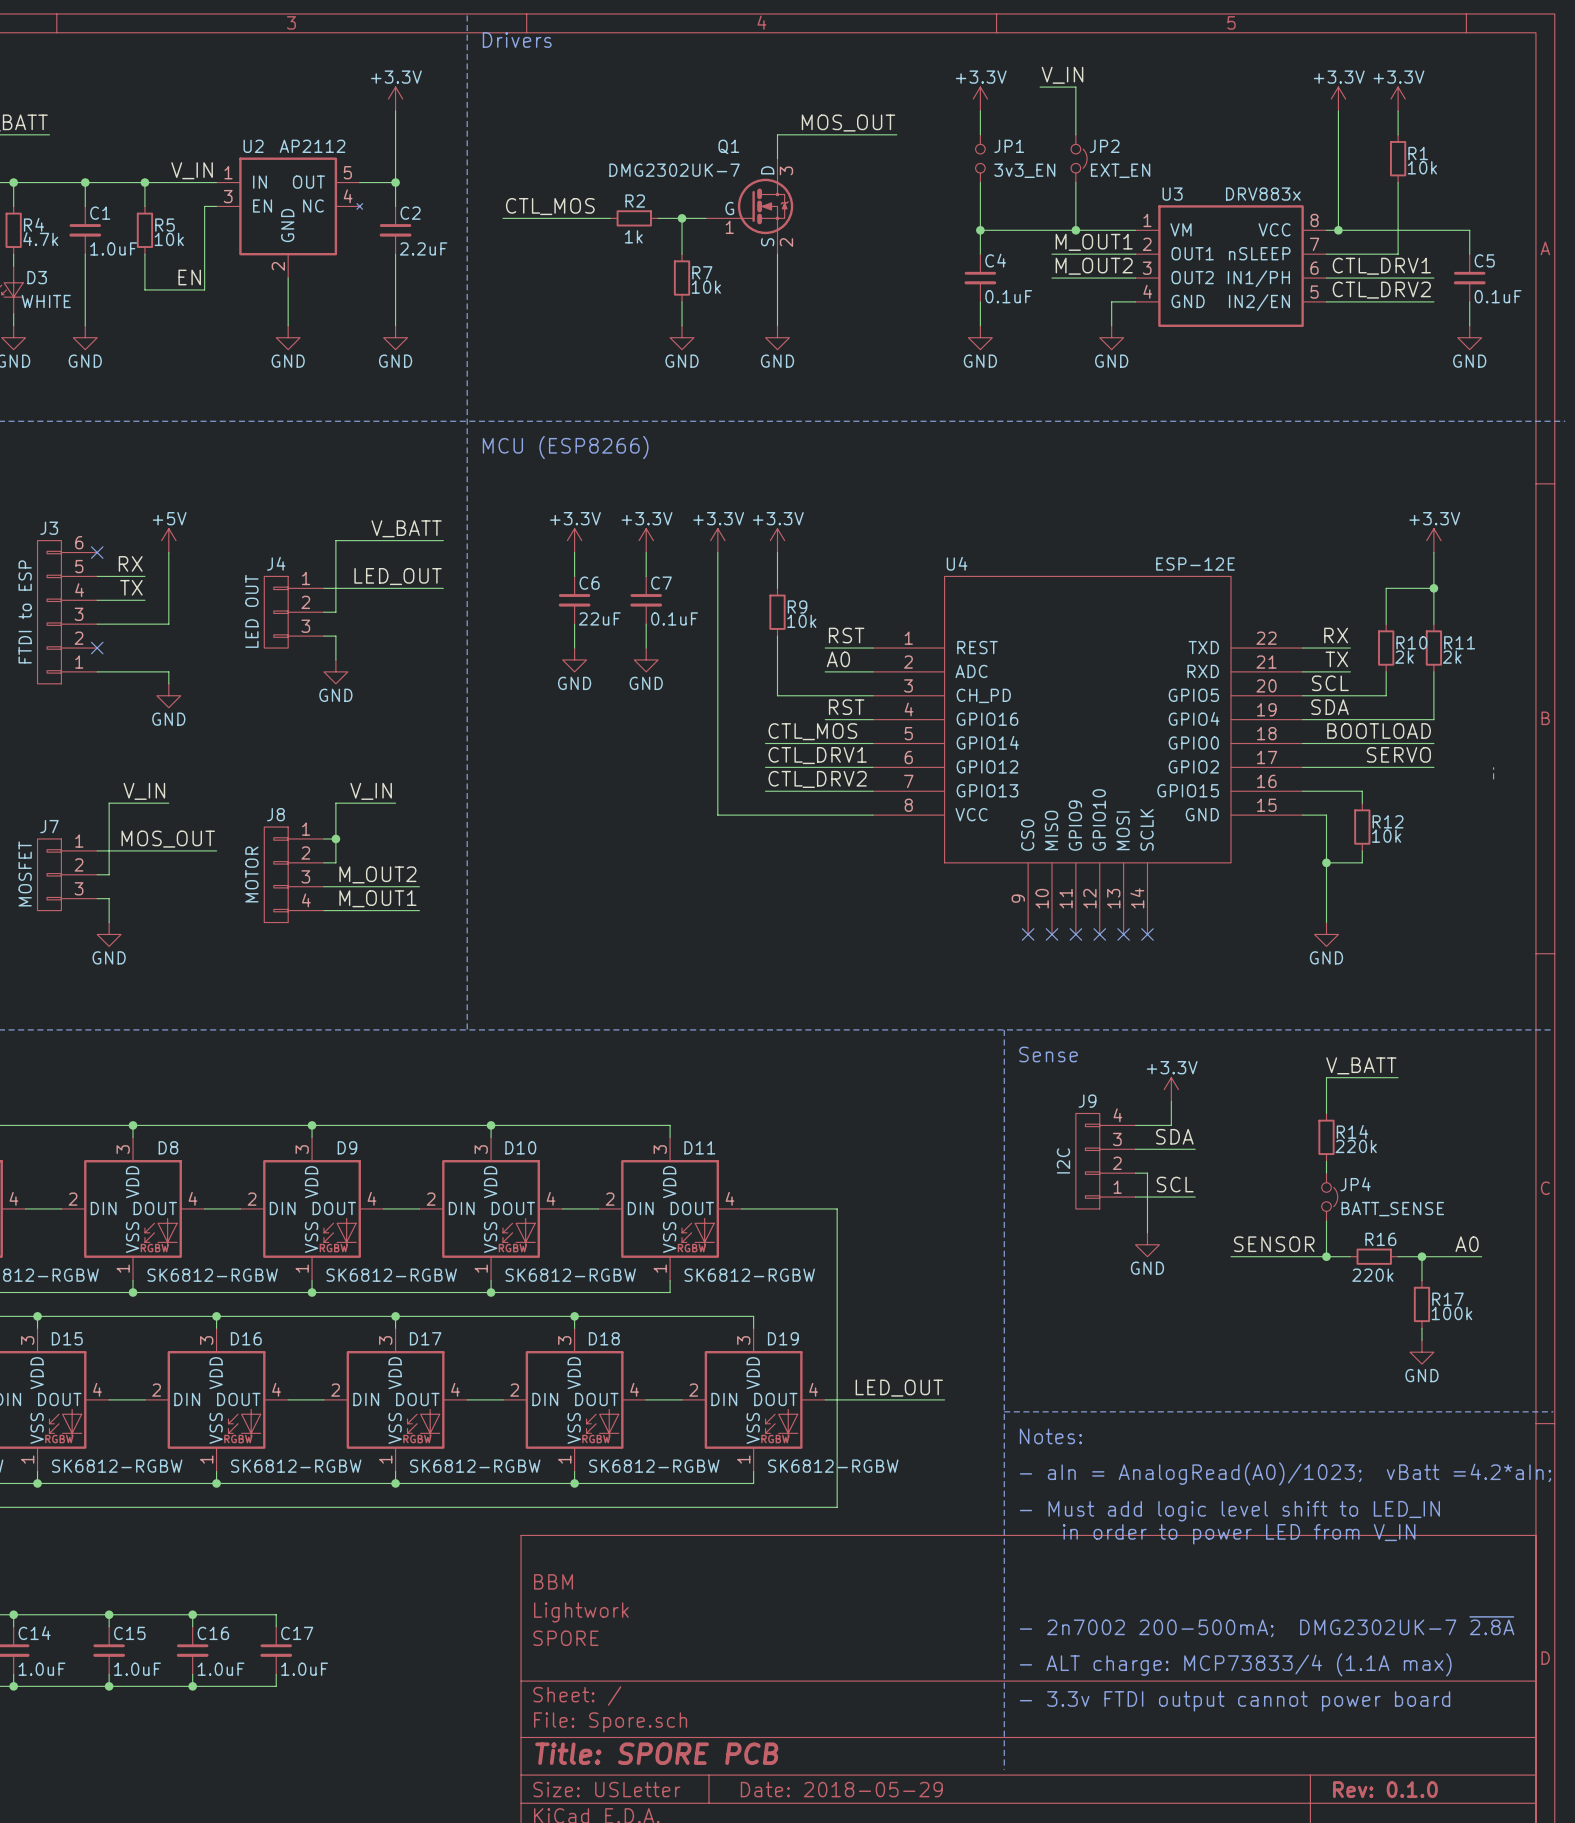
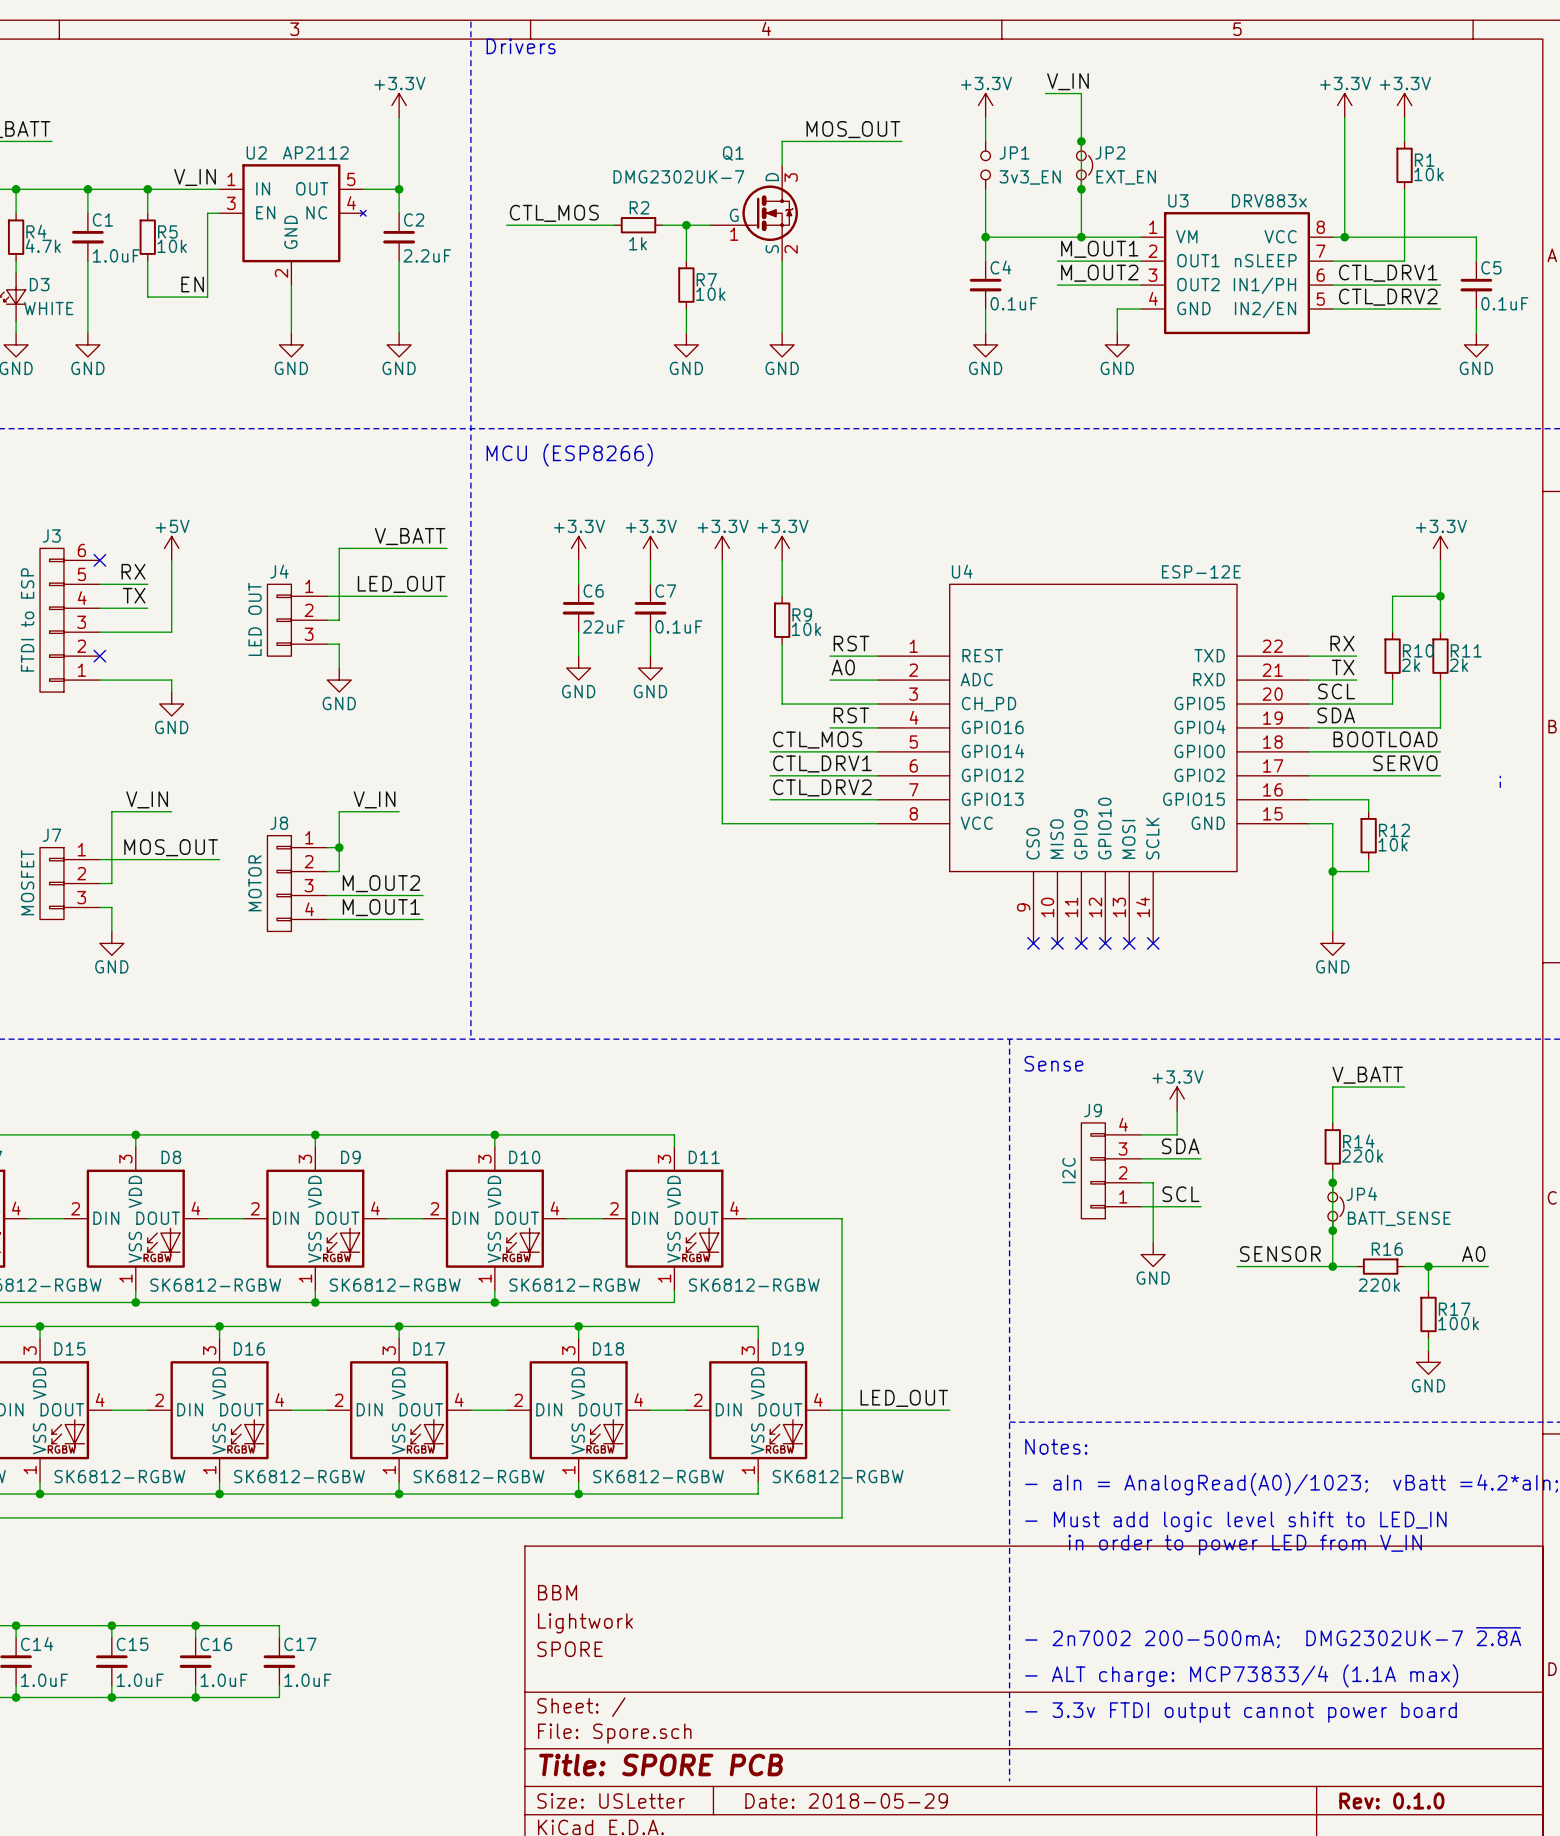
wire: none -> (1081, 141) (1081, 189)
junction: none -> (1081, 141)
junction: none -> (1081, 189)
wire: none -> (1332, 1182) (1332, 1230)
junction: none -> (1332, 1182)
junction: none -> (1332, 1230)

